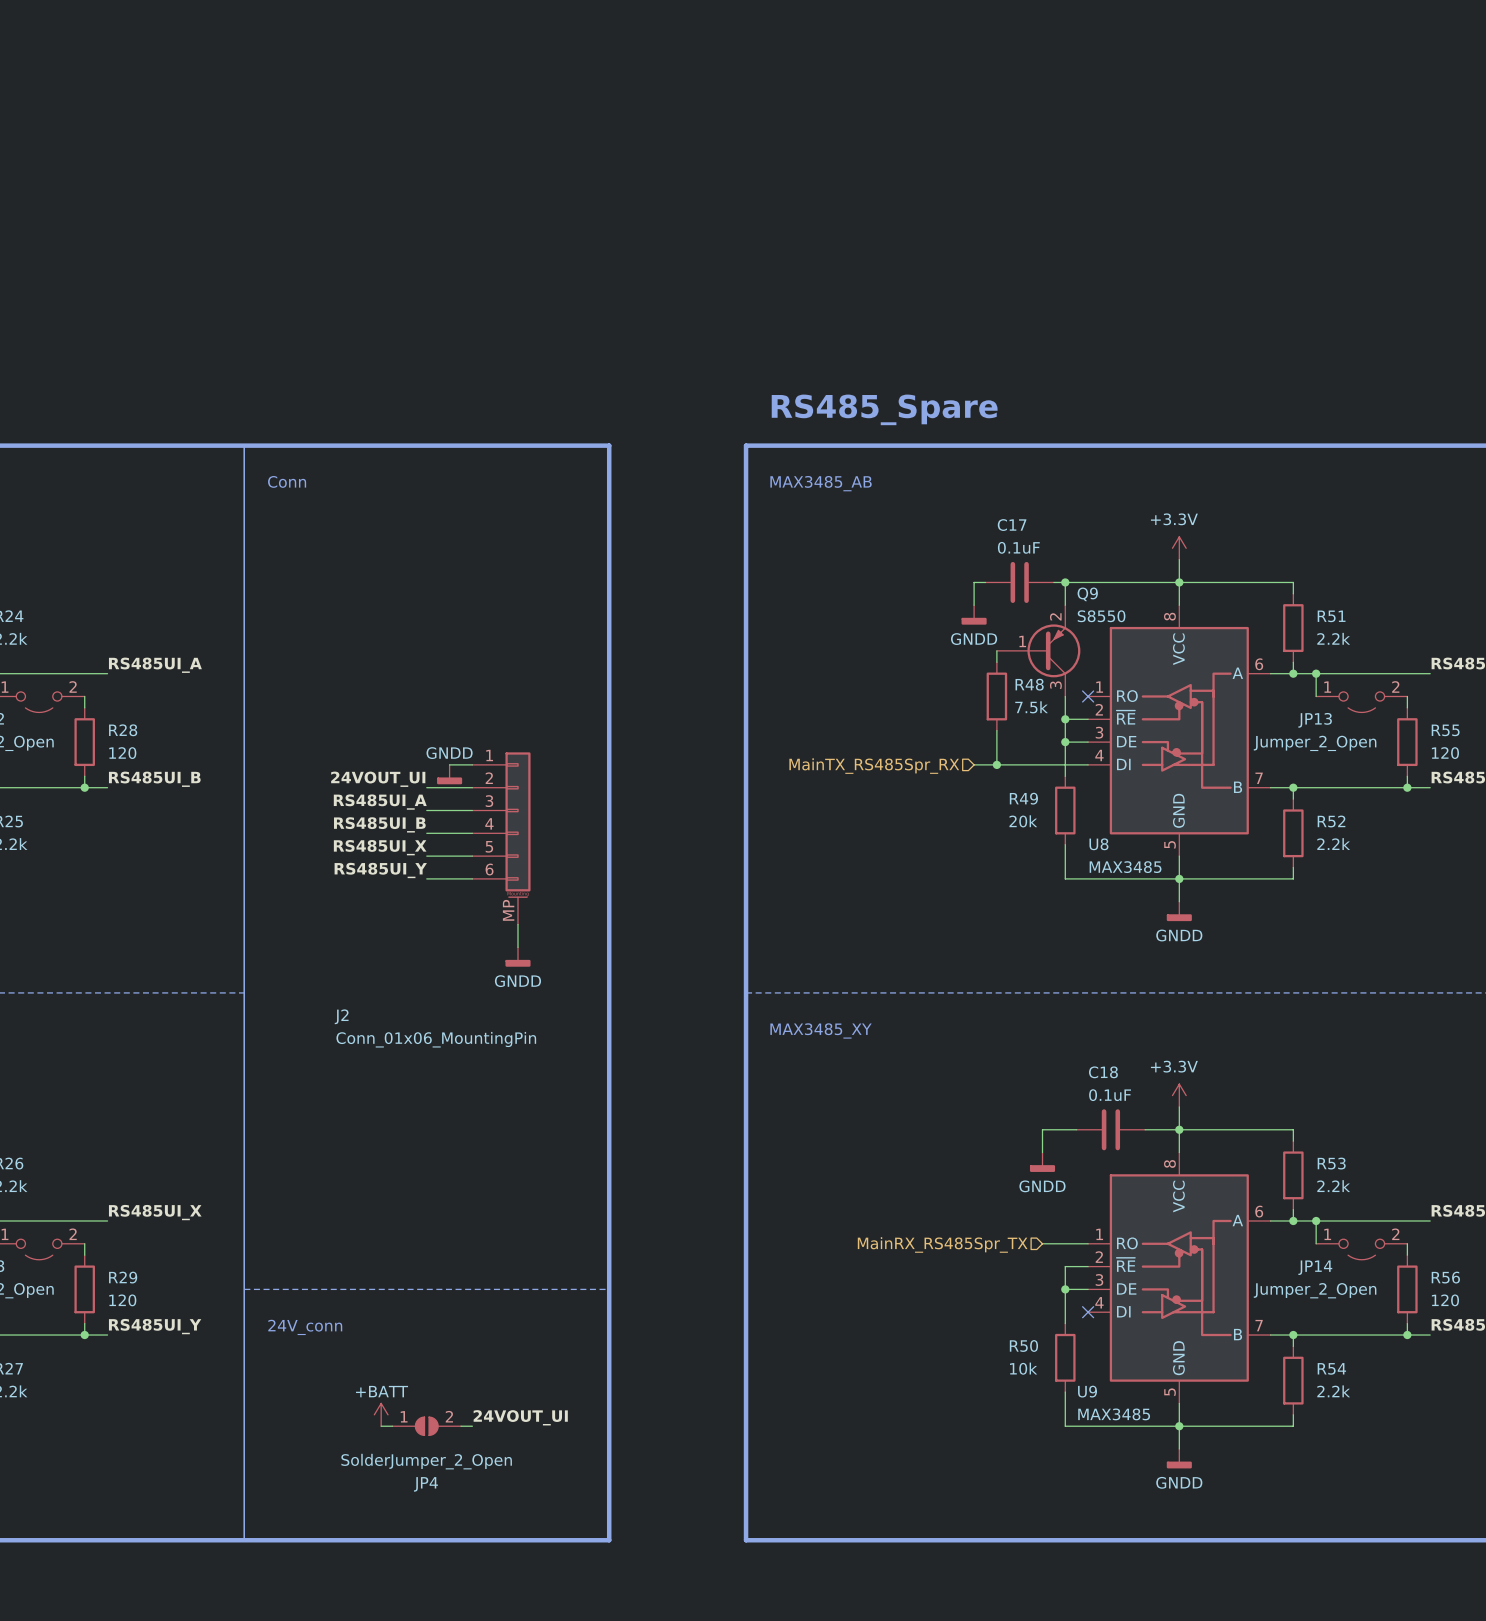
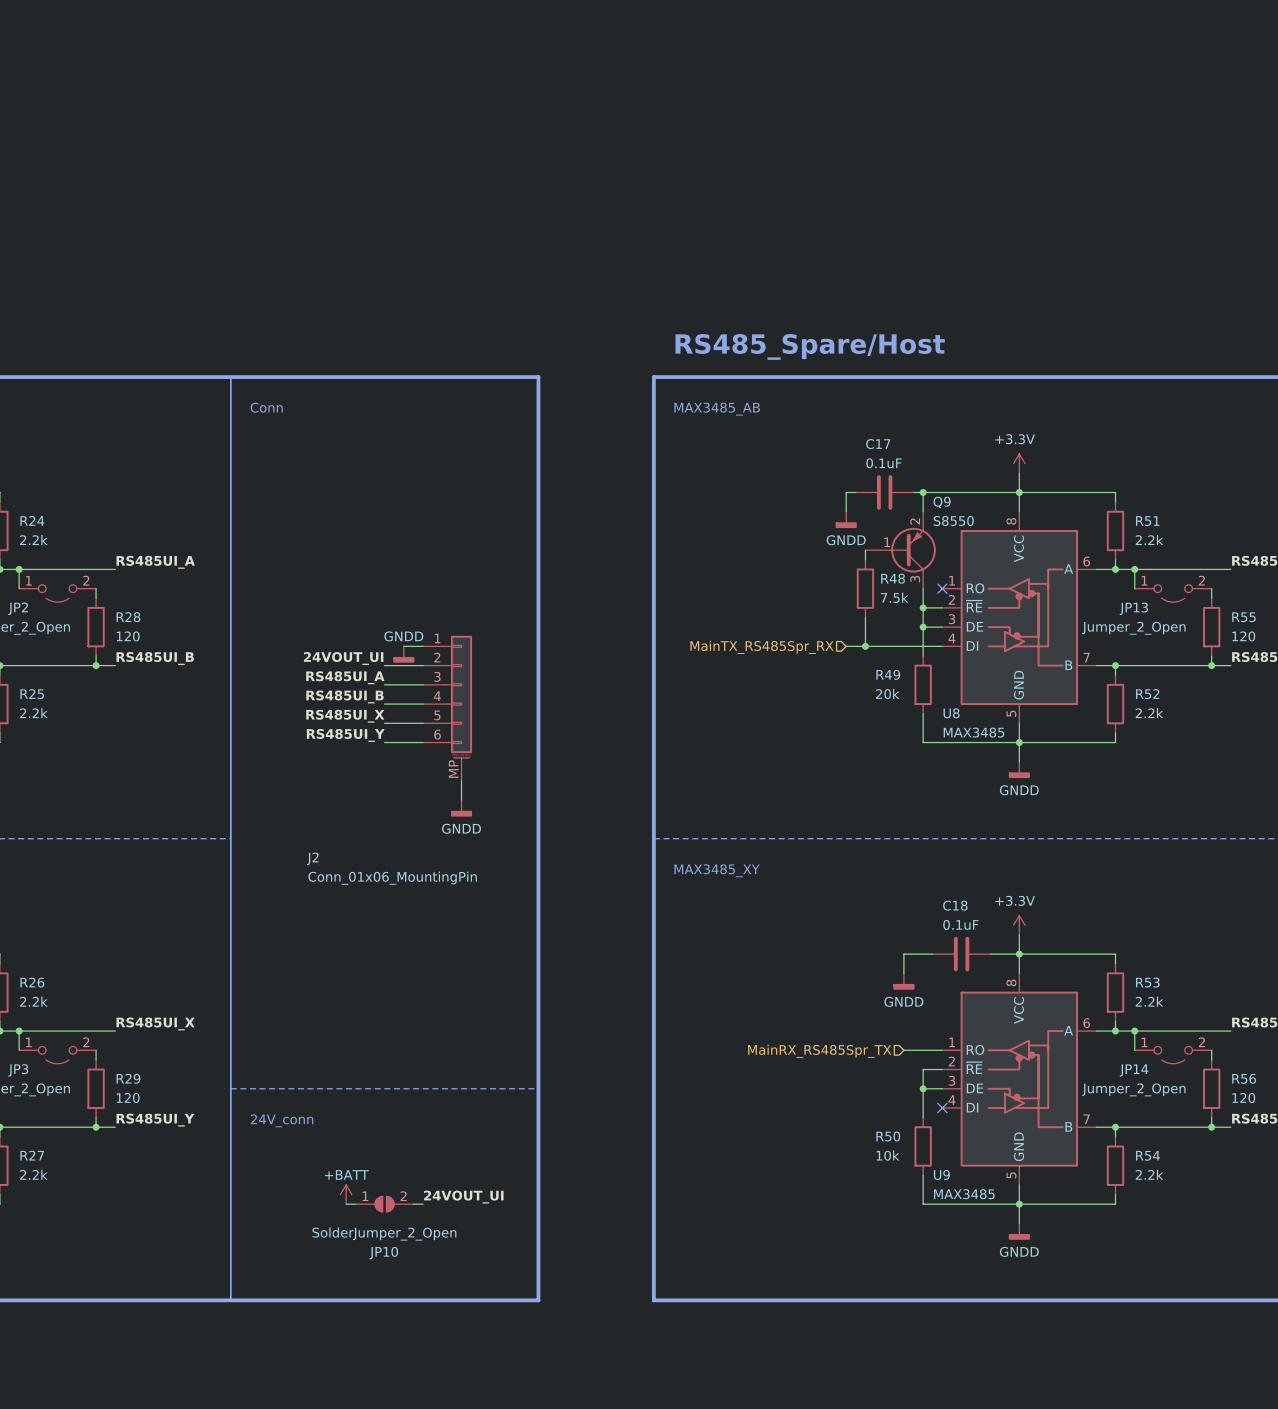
text: RS485_Spare (884, 409) -> RS485_Spare/Host (810, 346)
JP4 name: JP4 (425, 1484) -> JP10 (383, 1253)

